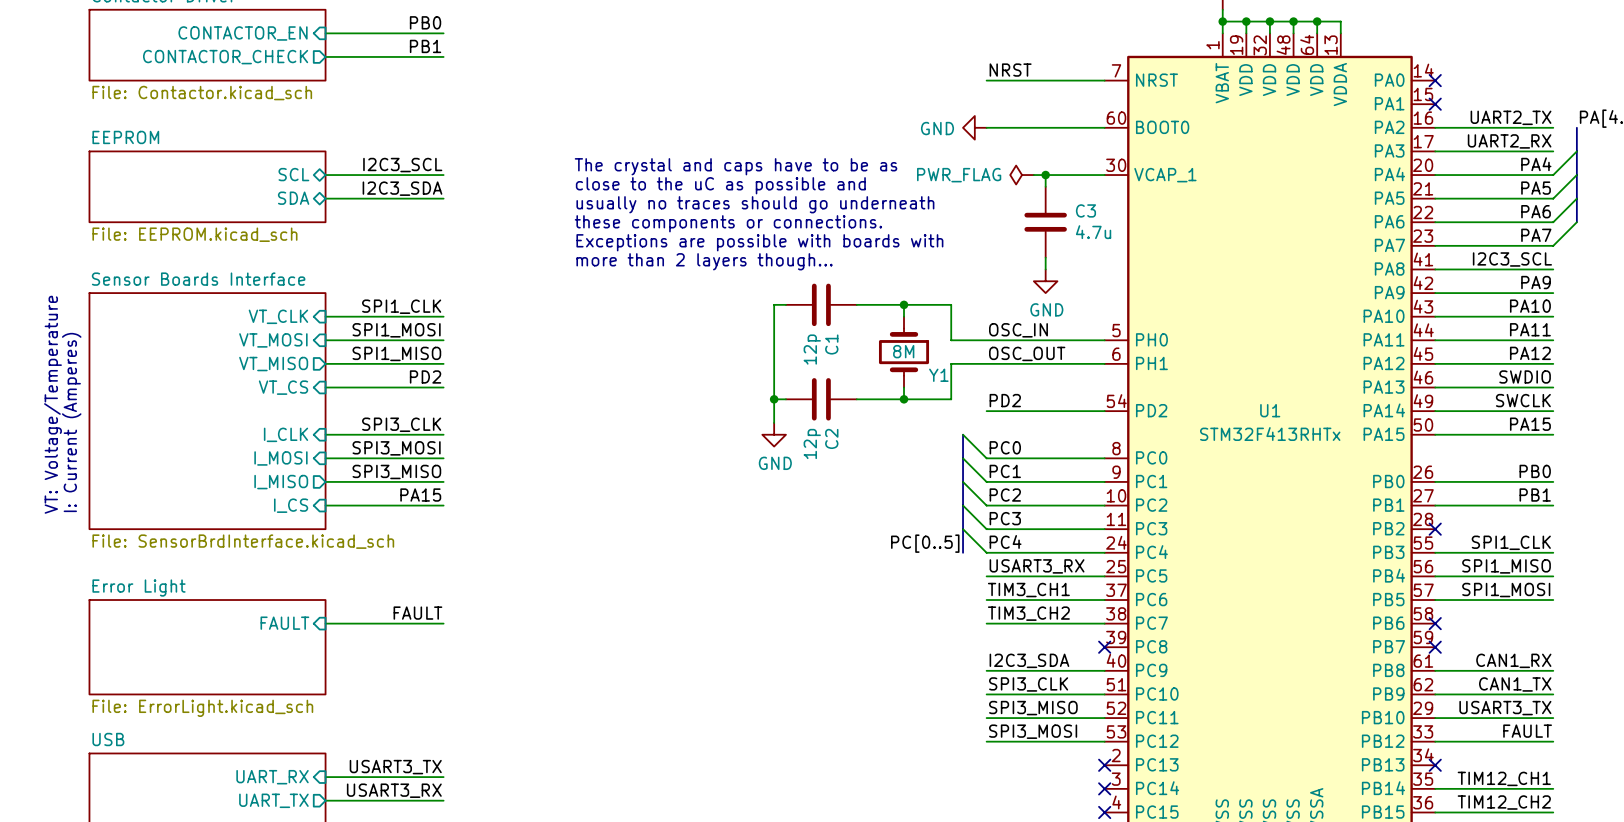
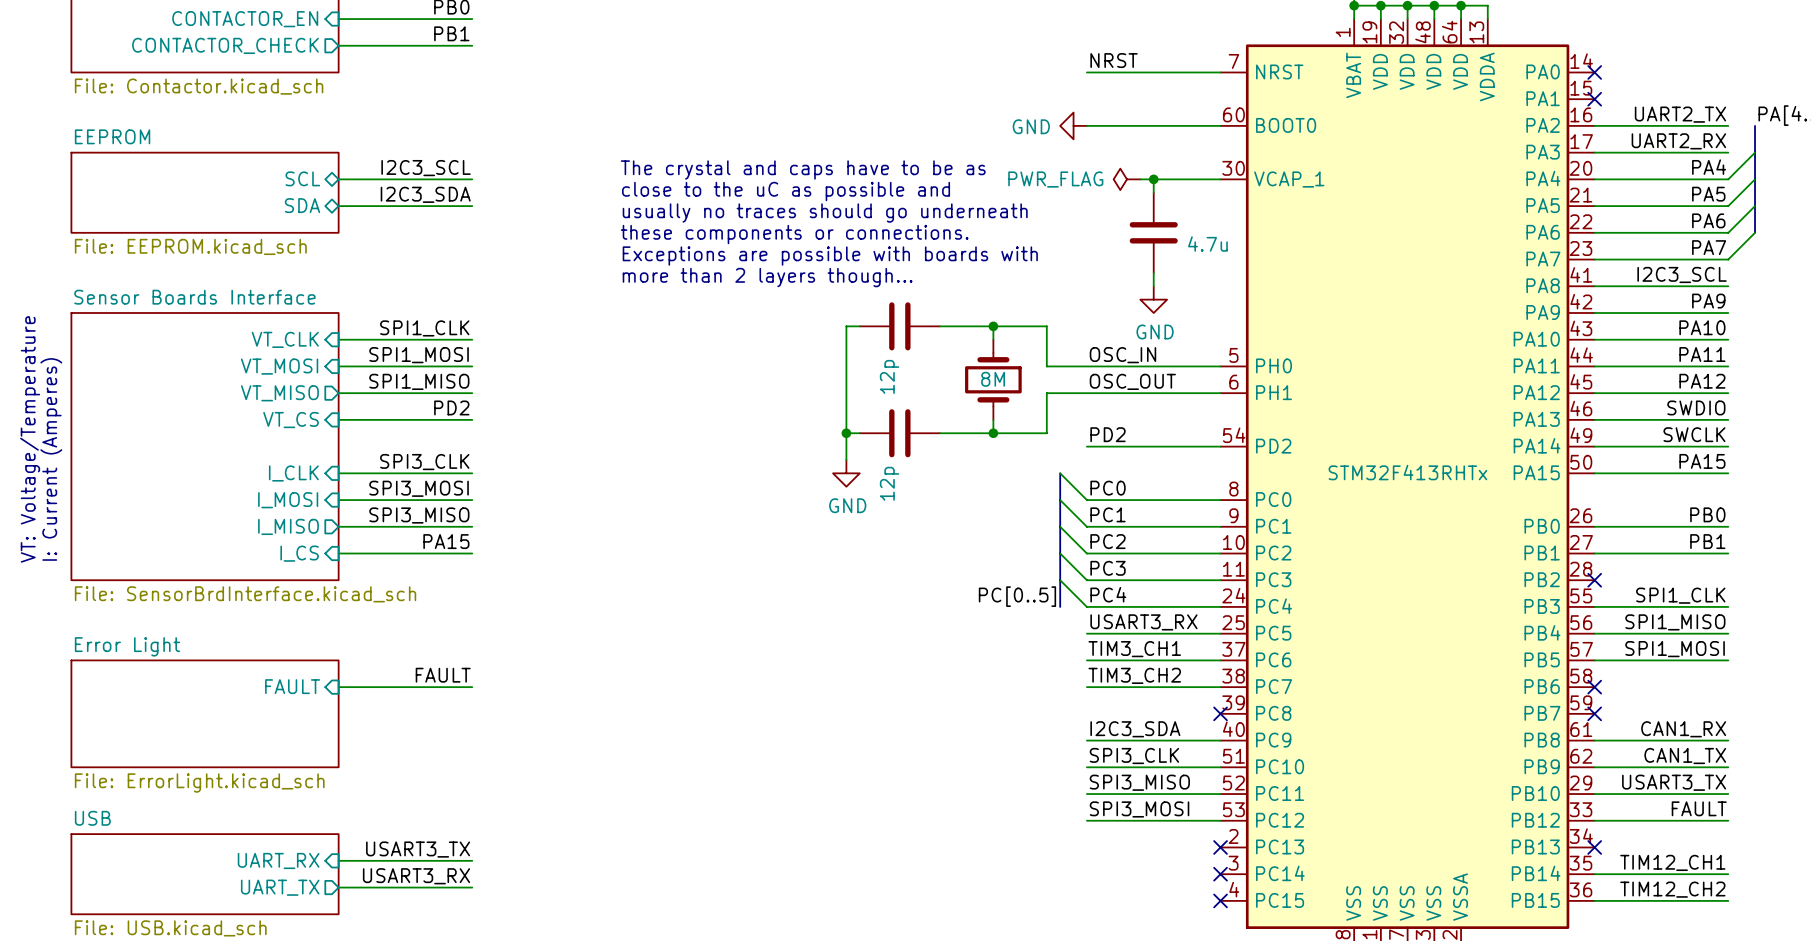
C3 name: C3 (1085, 210) -> none
C1 name: C1 (831, 344) -> none
Y1 name: Y1 (938, 375) -> none
U1 name: U1 (1270, 410) -> none
C2 name: C2 (831, 438) -> none

